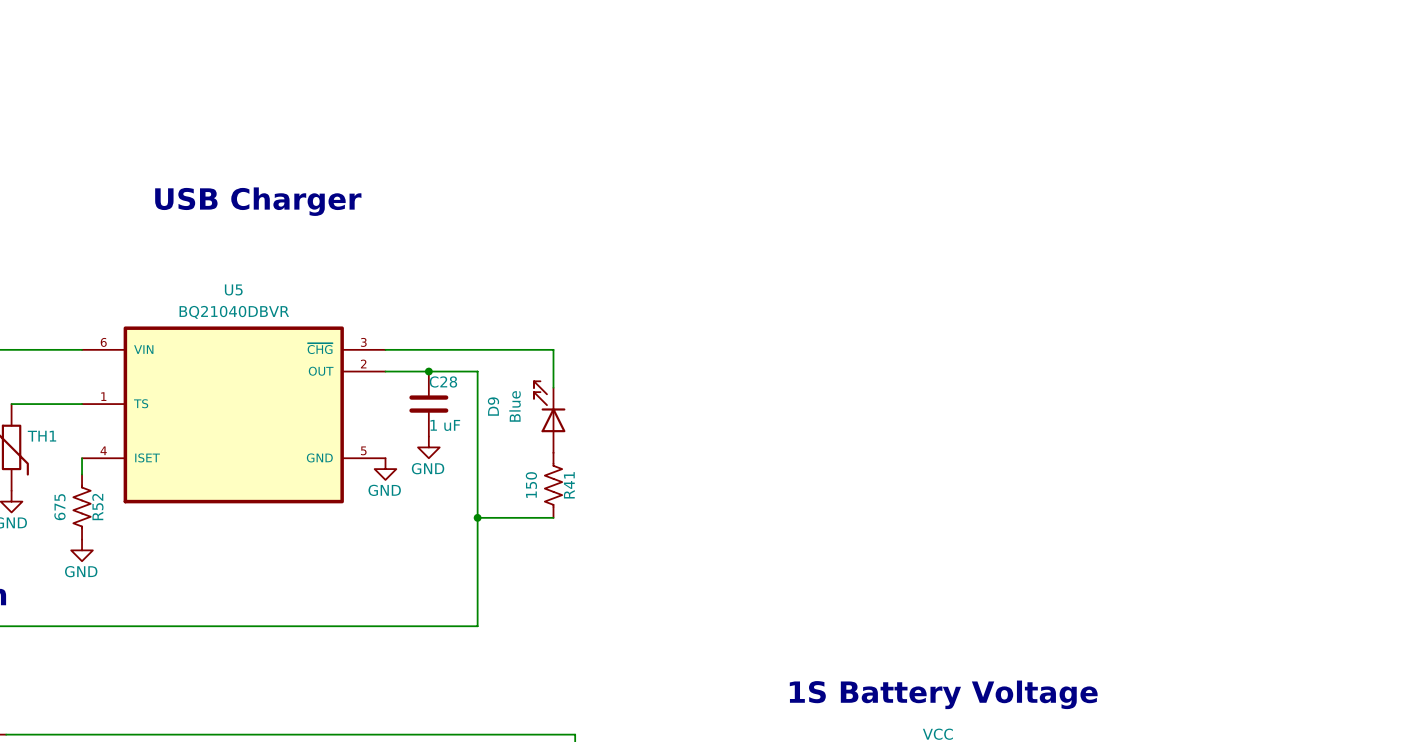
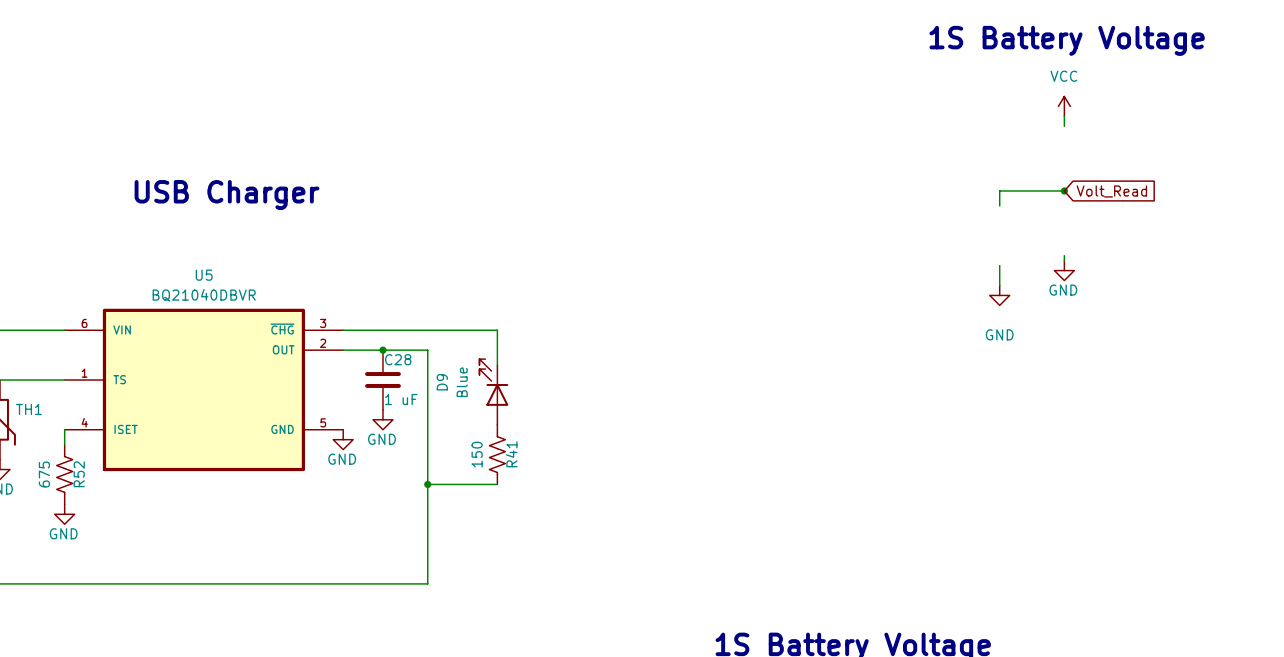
text: none -> 1S Battery Voltage (1067, 40)
power symbol: none -> VCC (1064, 106)
wire: none -> (1064, 116) (1064, 126)
wire: none -> (1064, 191) (999, 191) (999, 205)
junction: none -> (1064, 191)
global label: none -> Volt_Read (1111, 191)
wire: none -> (1064, 255) (1064, 260)
wire: none -> (999, 265) (999, 285)
power symbol: none -> GND (1064, 270)
power symbol: none -> GND (999, 295)

